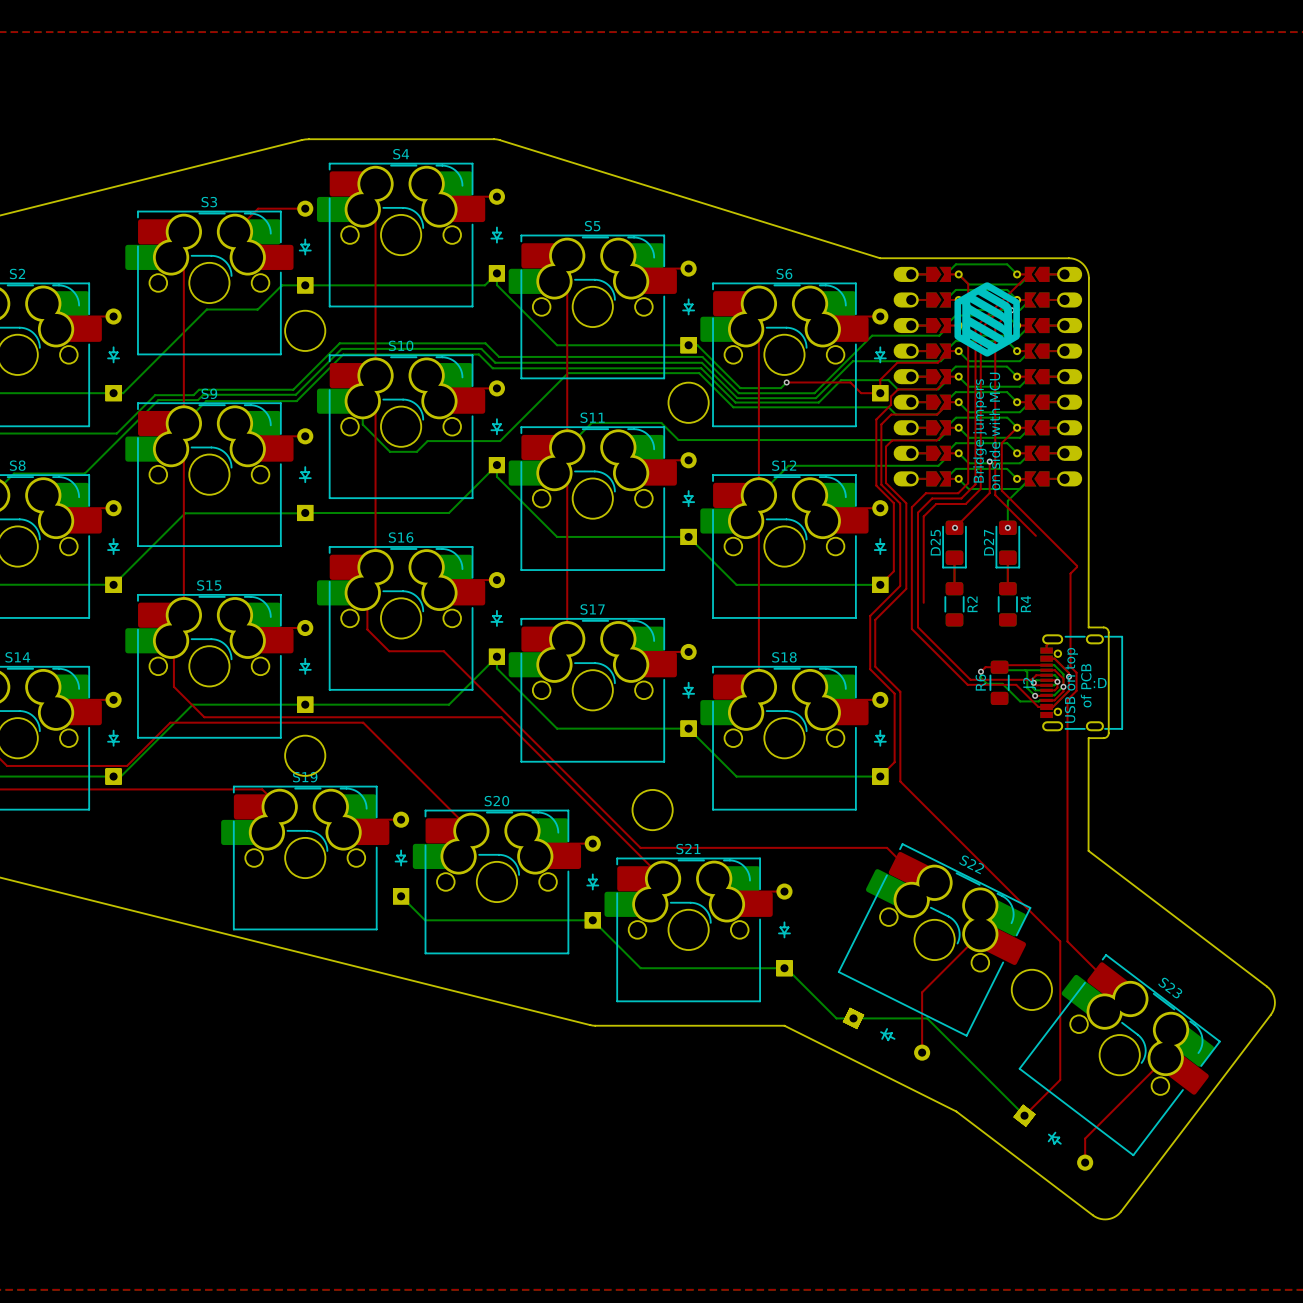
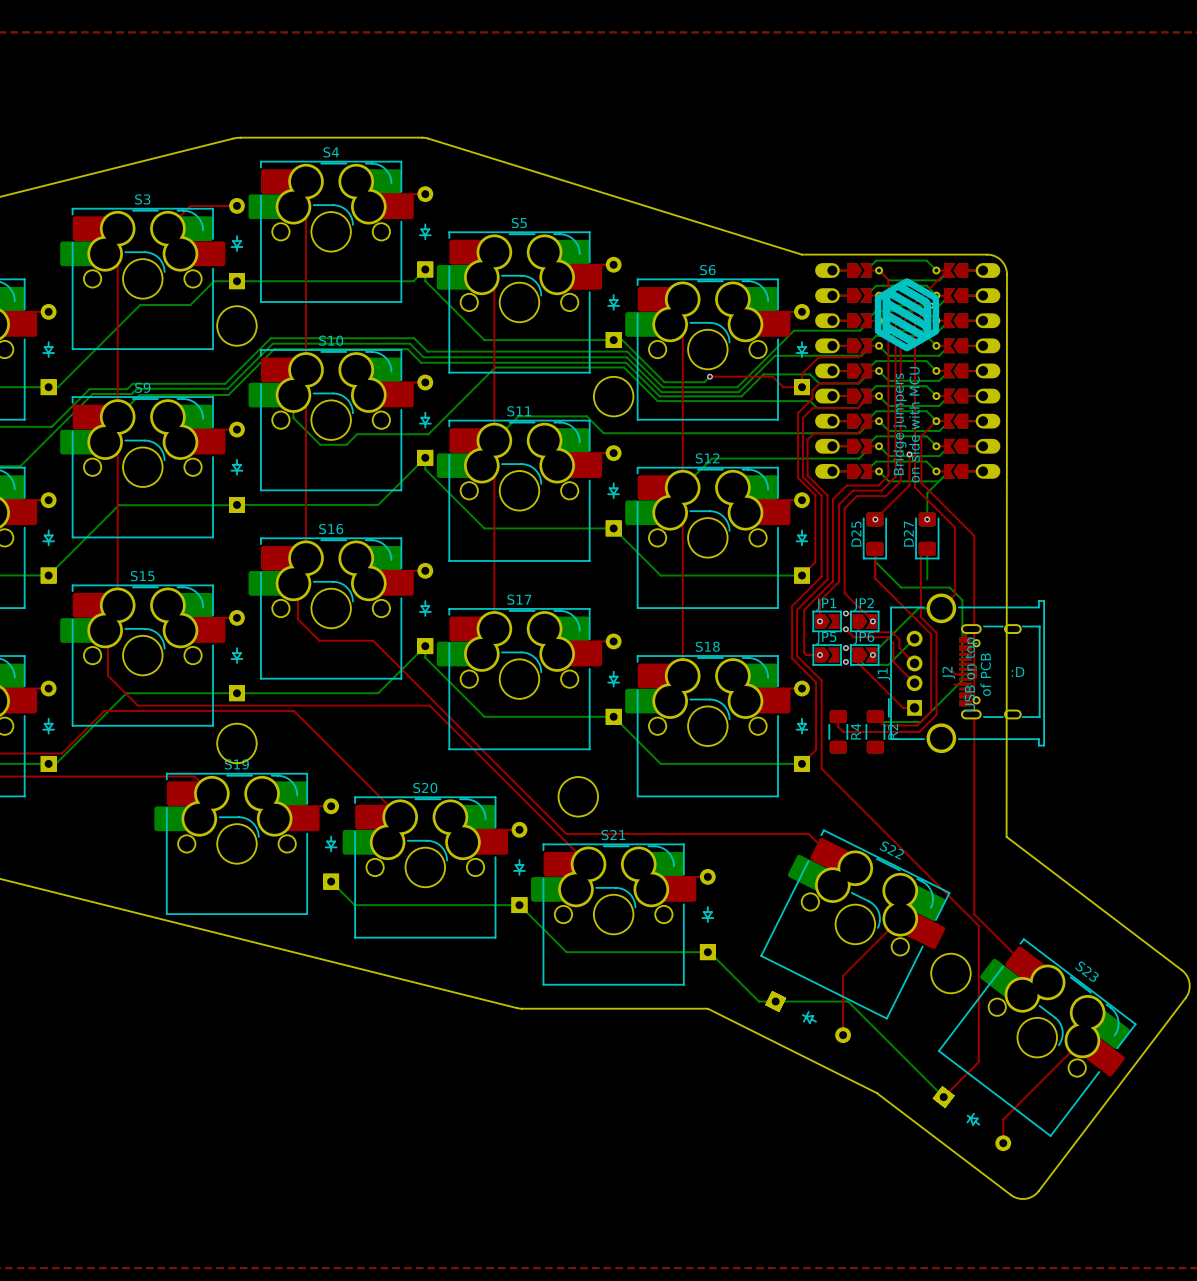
board edge: (1088, 278) (1088, 627) (1105, 627) (1108, 631) (1108, 733) (1105, 737) (1088, 738) (1088, 850) -> (1007, 274) (1006, 836)
top track: none -> (954, 527) (954, 594) (941, 608)
top track: (1055, 544) (1077, 565) (1070, 573) (1070, 666) (1076, 672) (1076, 690) (1067, 699) (1067, 941) -> (974, 535) (974, 914) (985, 925)
top track: none -> (875, 548) (875, 578) (931, 634) (931, 711) (917, 725) (884, 725) (875, 716)
bottom track: none -> (875, 548) (875, 561) (901, 587) (949, 587) (962, 600) (962, 680) (920, 722) (880, 722) (875, 716)
top track: (1007, 557) (1007, 588) -> (927, 548) (920, 555) (920, 617) (936, 632) (936, 714) (919, 731) (843, 731) (838, 726) (838, 716)
top track: (911, 590) (911, 628) (967, 684) (1016, 684) (1038, 706) (1052, 706) (1069, 690) (1069, 673) (1054, 658) (1046, 658) -> (832, 581) (804, 610) (804, 652) (806, 655) (820, 655)
top track: (917, 591) (917, 627) (970, 679) (1031, 679) (1036, 675) (1046, 675) -> (839, 581) (820, 600) (820, 621)
top track: none -> (844, 593) (872, 621)
R2 position: (954, 604) -> (875, 731)
R4 position: (1007, 604) -> (838, 731)
bottom track: none -> (941, 608) (918, 608) (871, 655)
top track: none -> (845, 613) (849, 613) (857, 621) (857, 628) (860, 632) (892, 632) (899, 639) (899, 648) (914, 663) (911, 663) (911, 660)
via: none -> (845, 613)
via: none -> (820, 621)
JP1: none -> (827, 621)
top track: none -> (834, 621) (853, 637) (887, 637) (893, 643) (893, 662) (914, 683)
JP2: none -> (864, 621)
via: none -> (872, 621)
via: none -> (845, 629)
bottom track: none -> (914, 638) (888, 664) (864, 664) (857, 658) (857, 655)
top track: none -> (845, 648) (850, 648) (857, 655) (857, 662) (903, 707) (914, 707)
via: none -> (845, 648)
via: none -> (820, 655)
JP5: none -> (827, 655)
JP6: none -> (864, 655)
via: none -> (872, 655)
top track: (1046, 665) (1001, 665) (999, 667) (985, 667) (980, 671) -> none
bottom track: (1046, 665) (1054, 665) (1063, 674) (1063, 686) (1054, 695) (1046, 695) -> none
bottom track: (999, 667) (1002, 670) (1046, 670) -> none
bottom track: (1025, 670) (1027, 672) (1027, 688) (1035, 695) -> none
top track: (1046, 670) (1054, 670) (1063, 678) (1063, 691) (1054, 700) (1046, 700) -> none
bottom track: (980, 671) (980, 677) (987, 683) (1002, 683) (1020, 701) (1046, 700) -> none
via: (980, 671) -> none
via: none -> (845, 661)
via: (1069, 676) -> none
bottom track: (1046, 680) (1036, 680) (1032, 683) (1035, 690) (1046, 690) -> none
via: (1057, 681) -> none
R6: (999, 682) -> none
via: (1033, 682) -> none
J1: none -> (966, 673)
text position: USB on top (1071, 685) -> USB on top (971, 674)
text position: of PCB (1086, 685) -> of PCB (985, 674)
via: (1063, 686) -> none
via: (1035, 695) -> none

